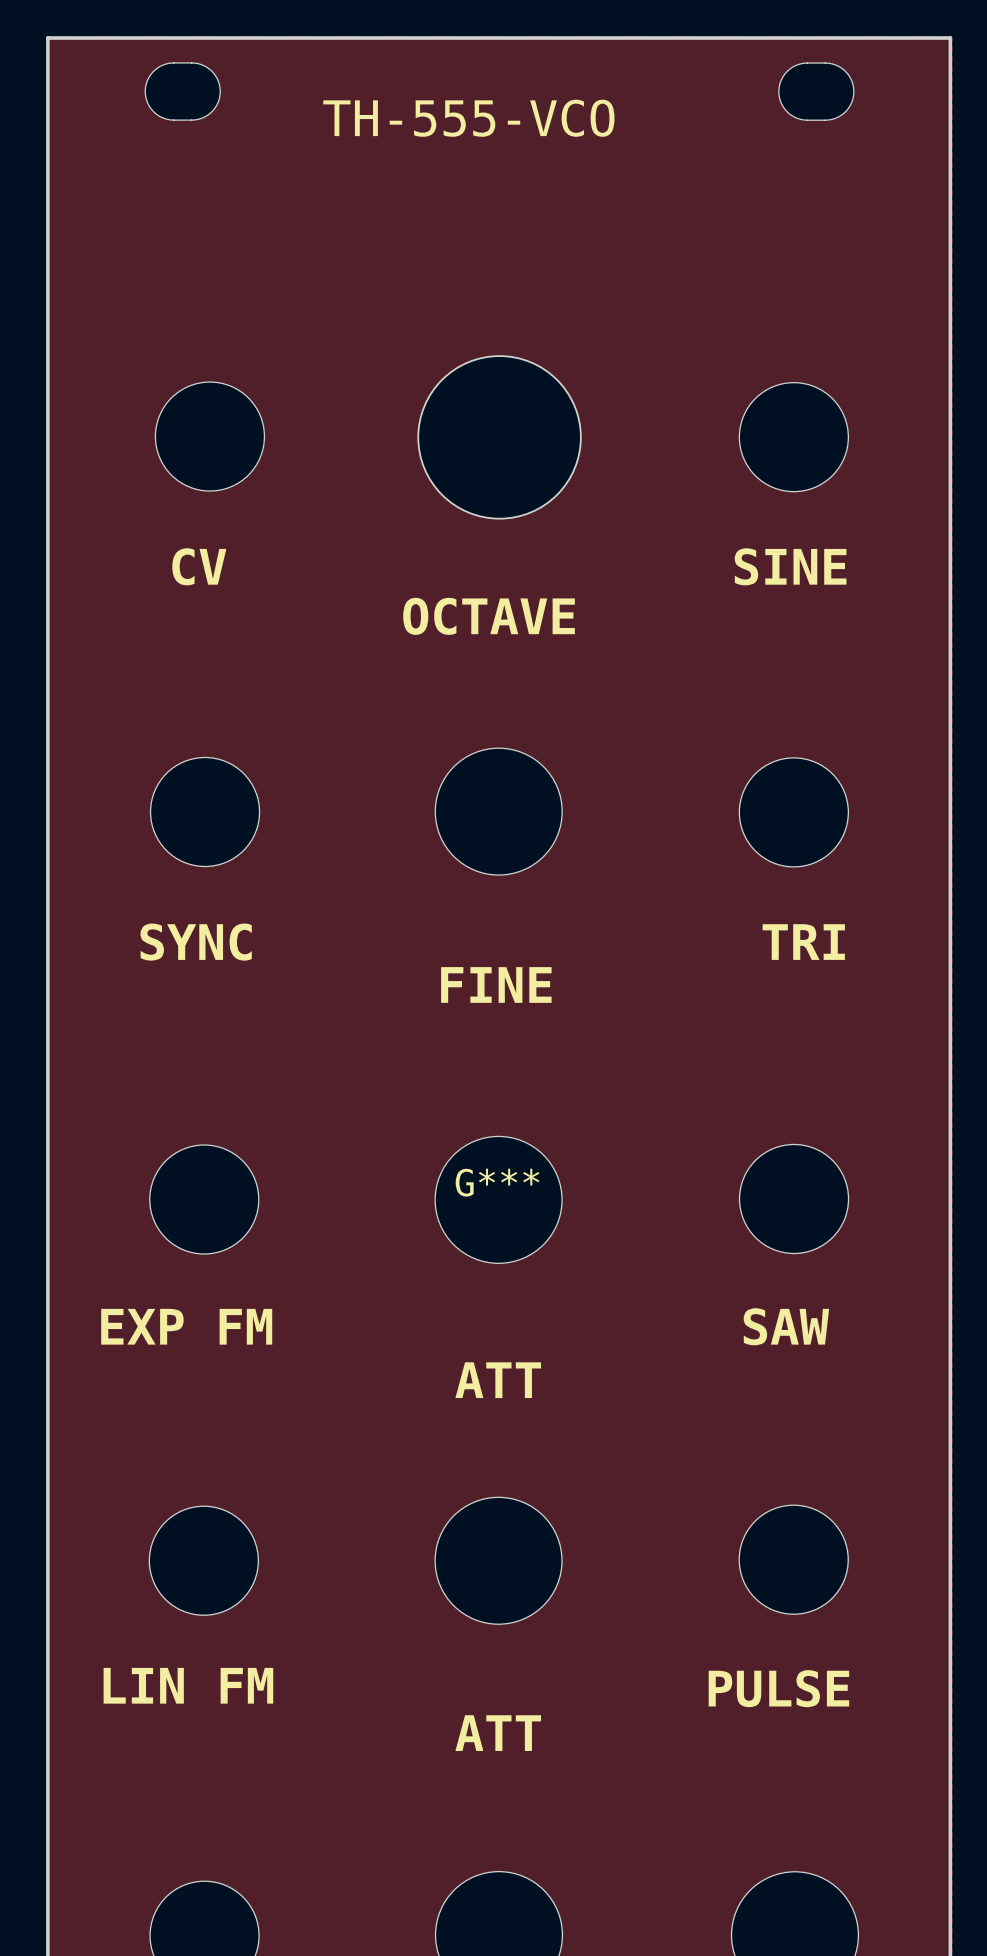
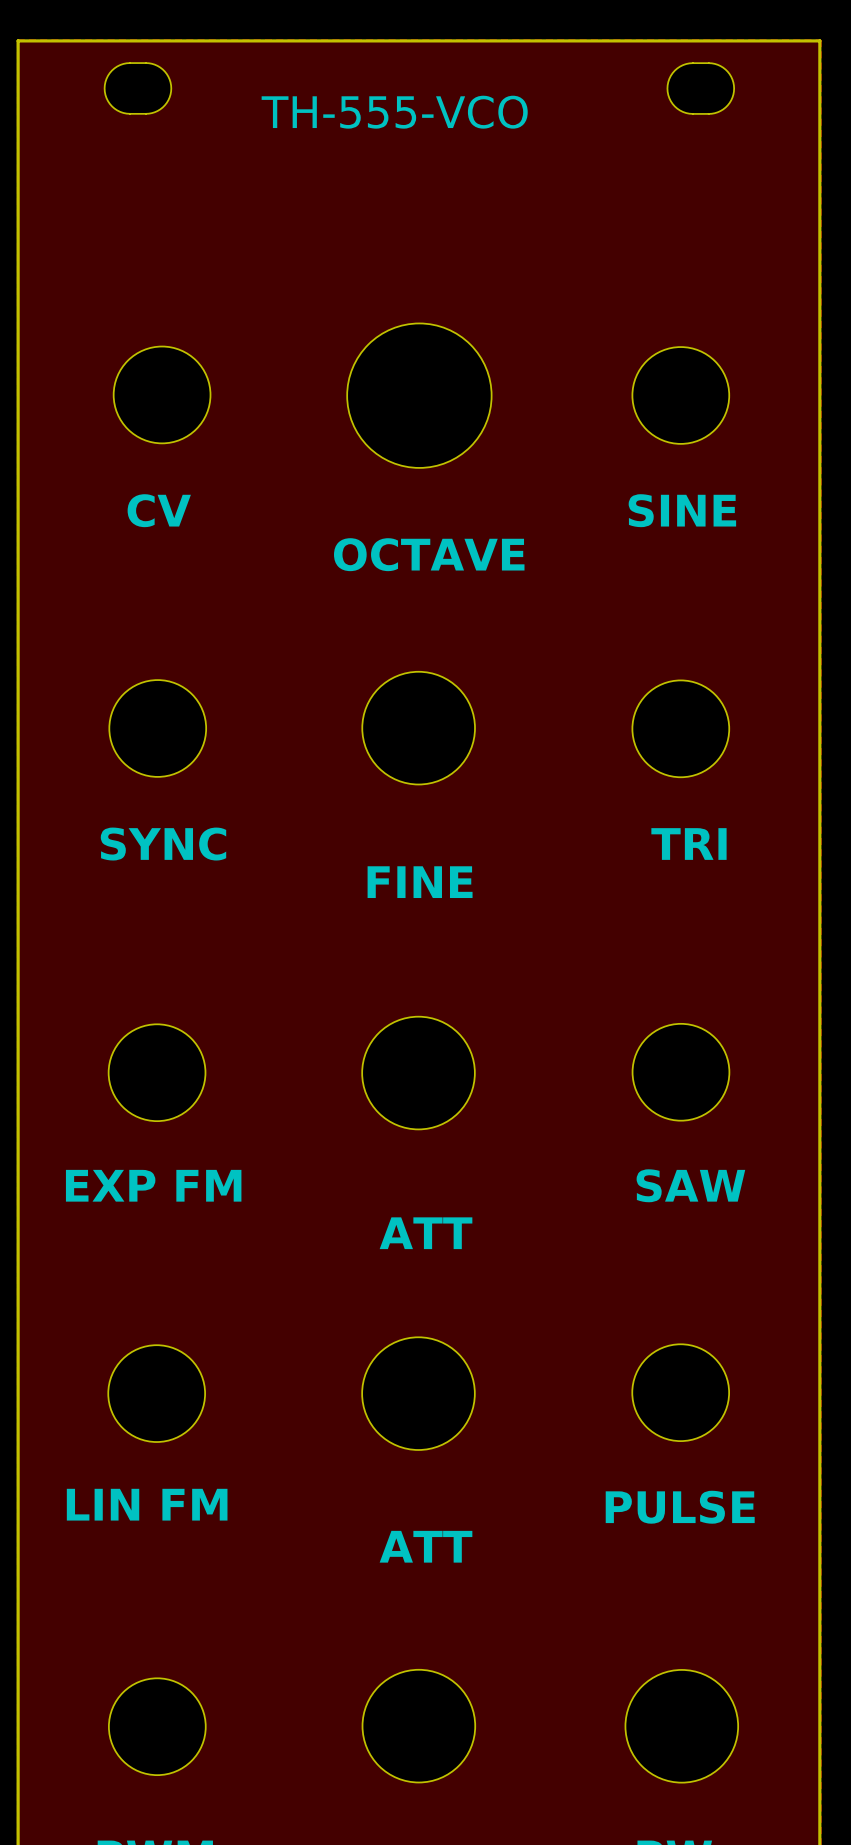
G***: (497, 1182) -> none

